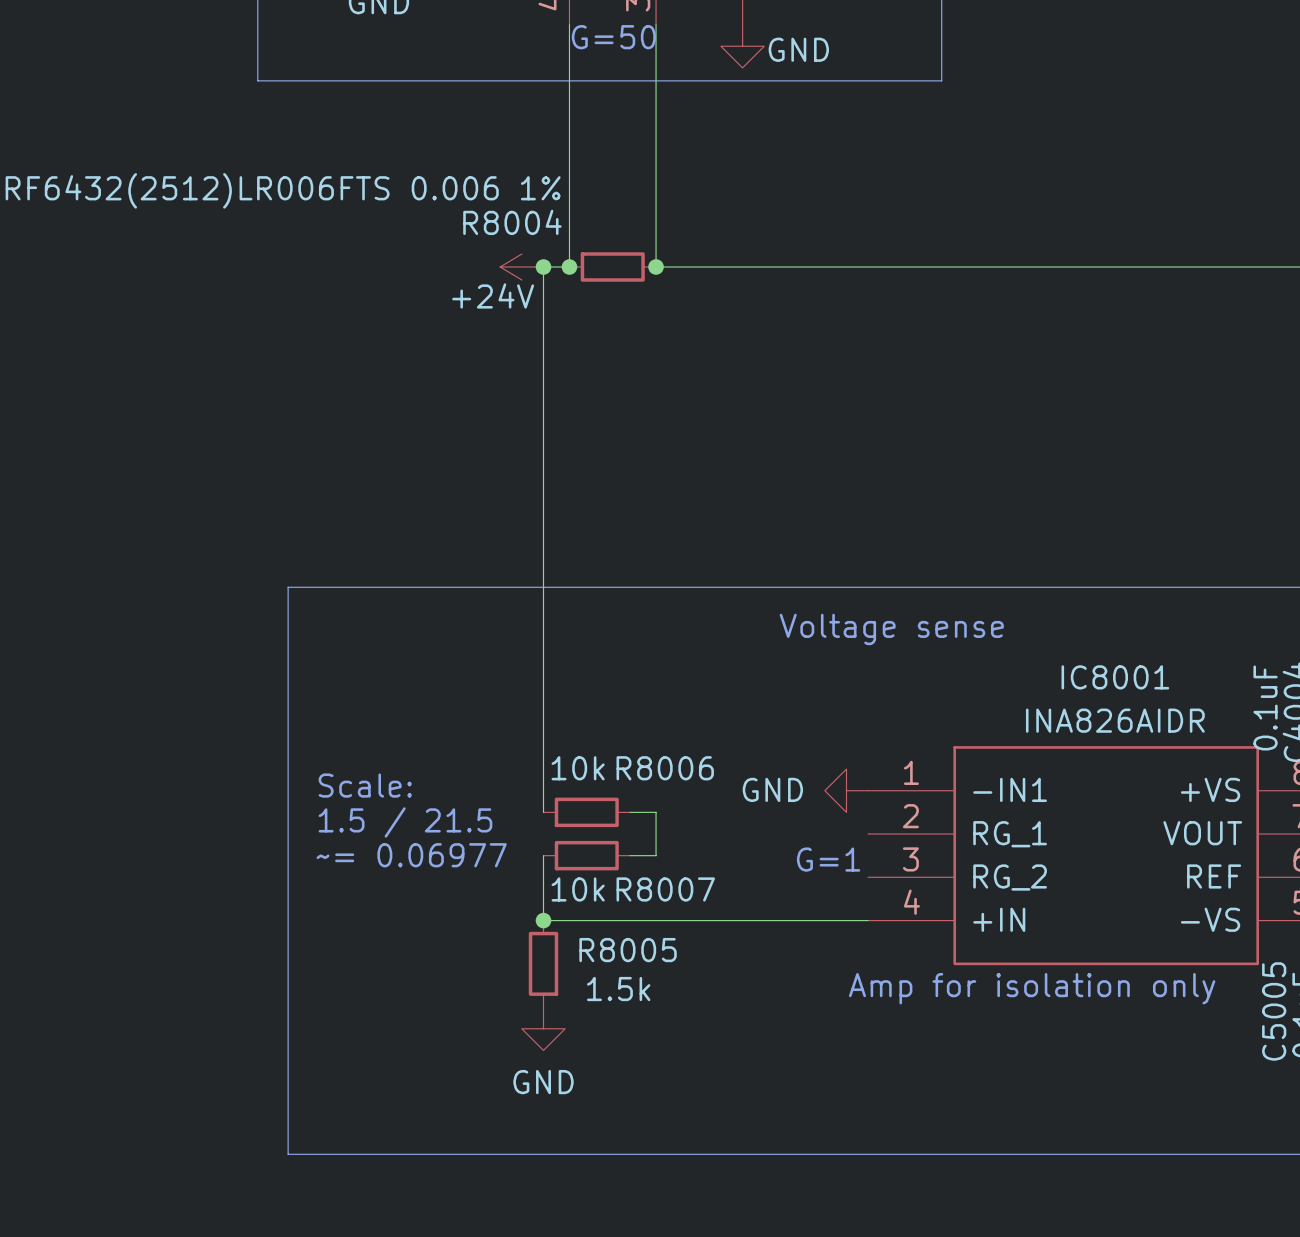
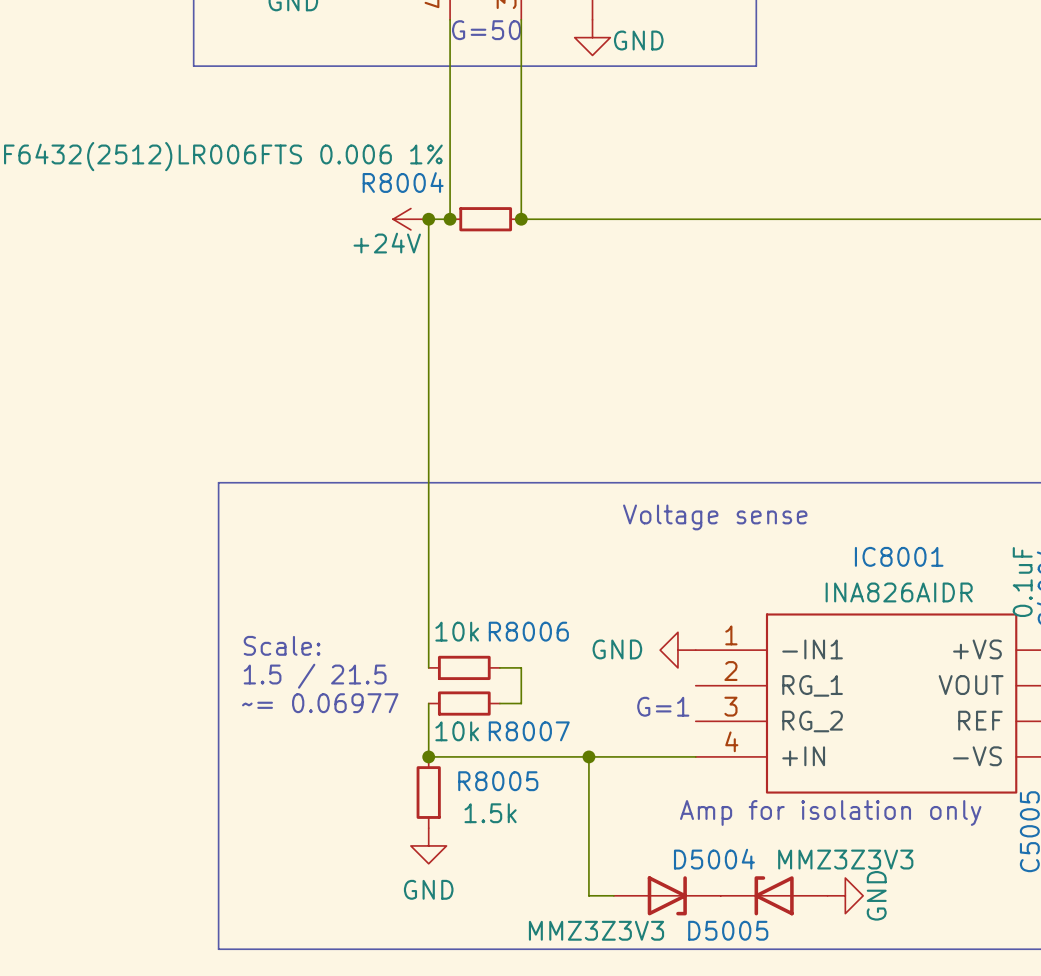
wire: none -> (588, 756) (588, 895) (613, 895)
junction: none -> (588, 756)
D5005: none -> MMZ3Z3V3 (667, 895)
D5004: none -> MMZ3Z3V3 (774, 895)
power symbol: none -> GND (845, 895)

